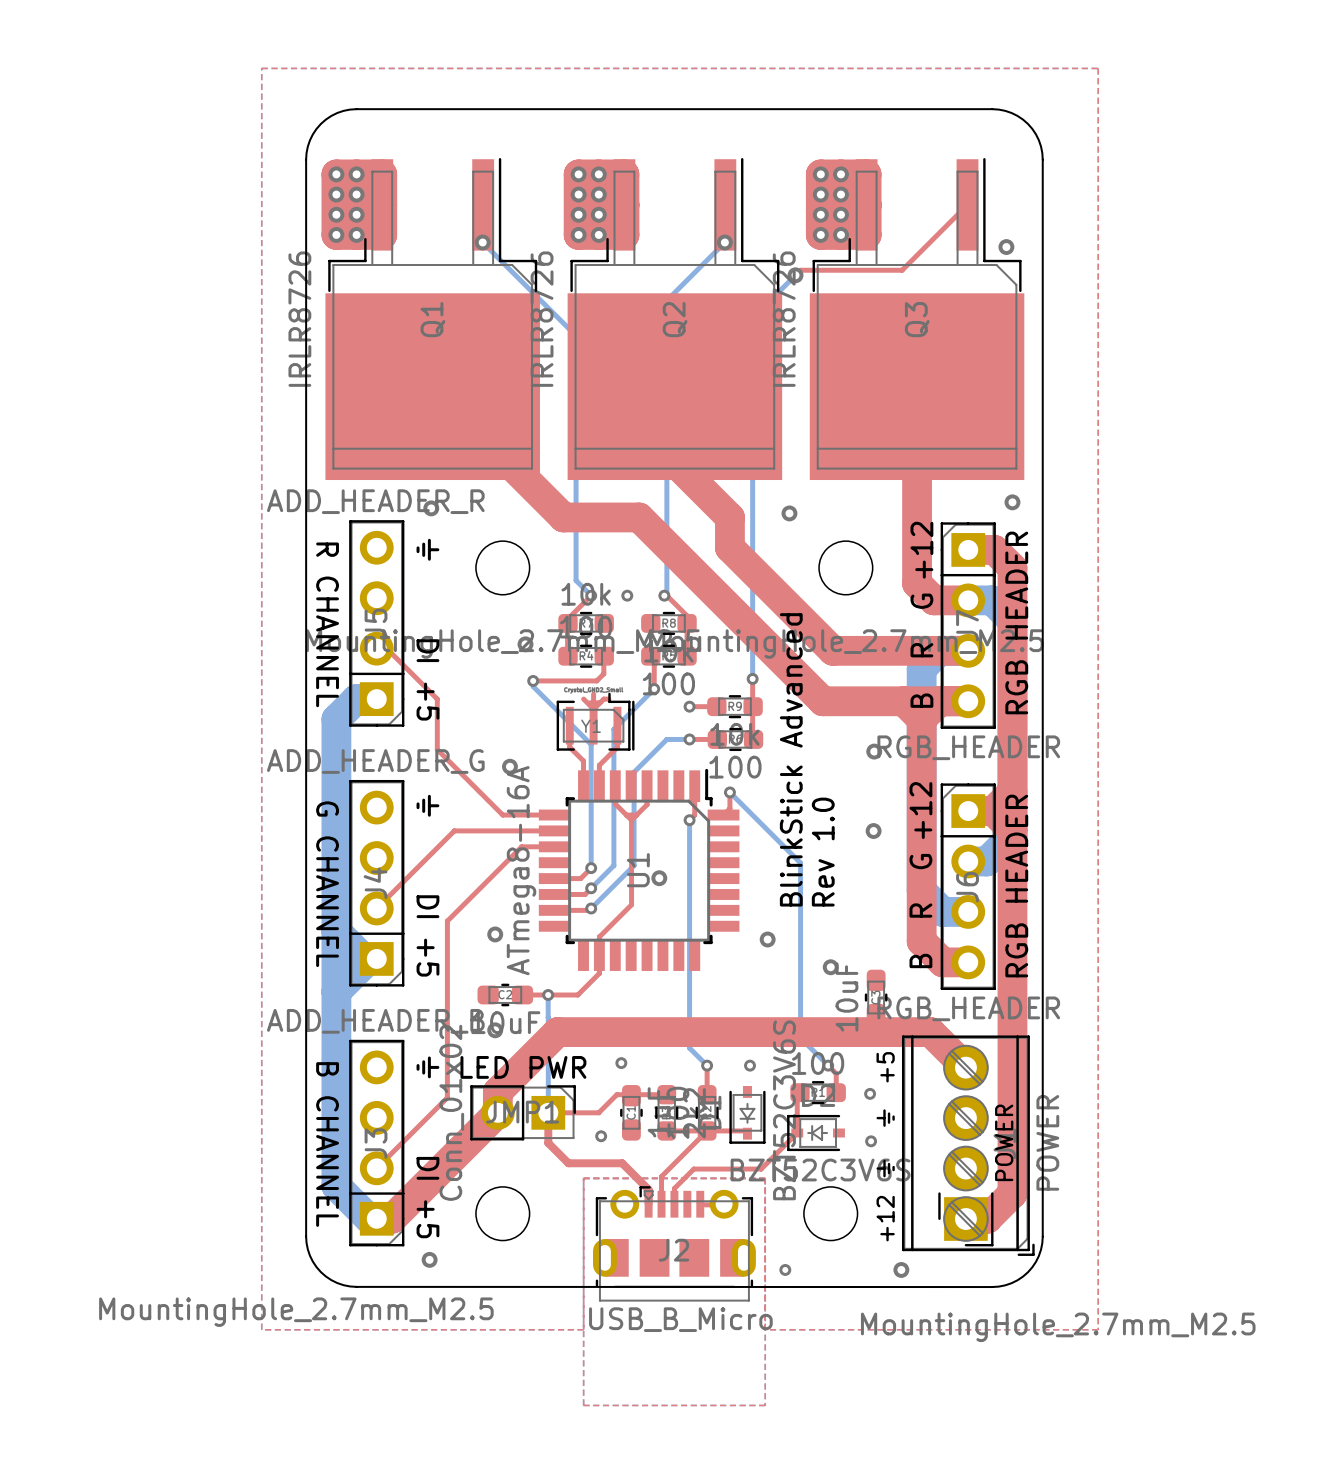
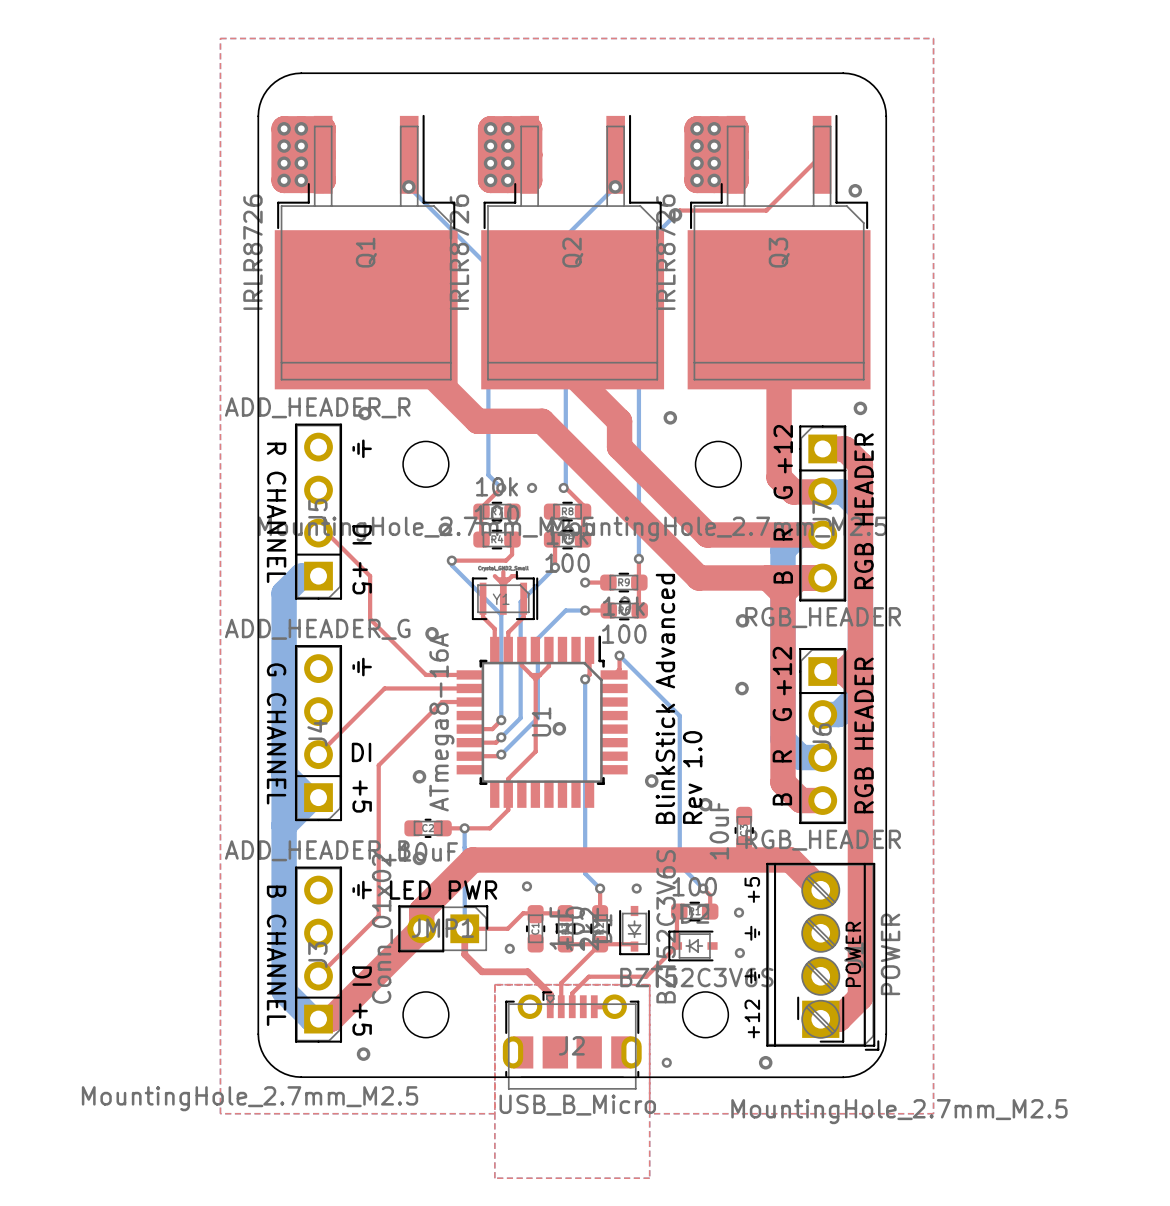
text position: BlinkStick Advanced (791, 759) -> BlinkStick Advanced (665, 698)
text position: Rev 1.0 (823, 852) -> Rev 1.0 (692, 777)
text rotation: 0° (427, 906) -> 90° counterclockwise (361, 752)

